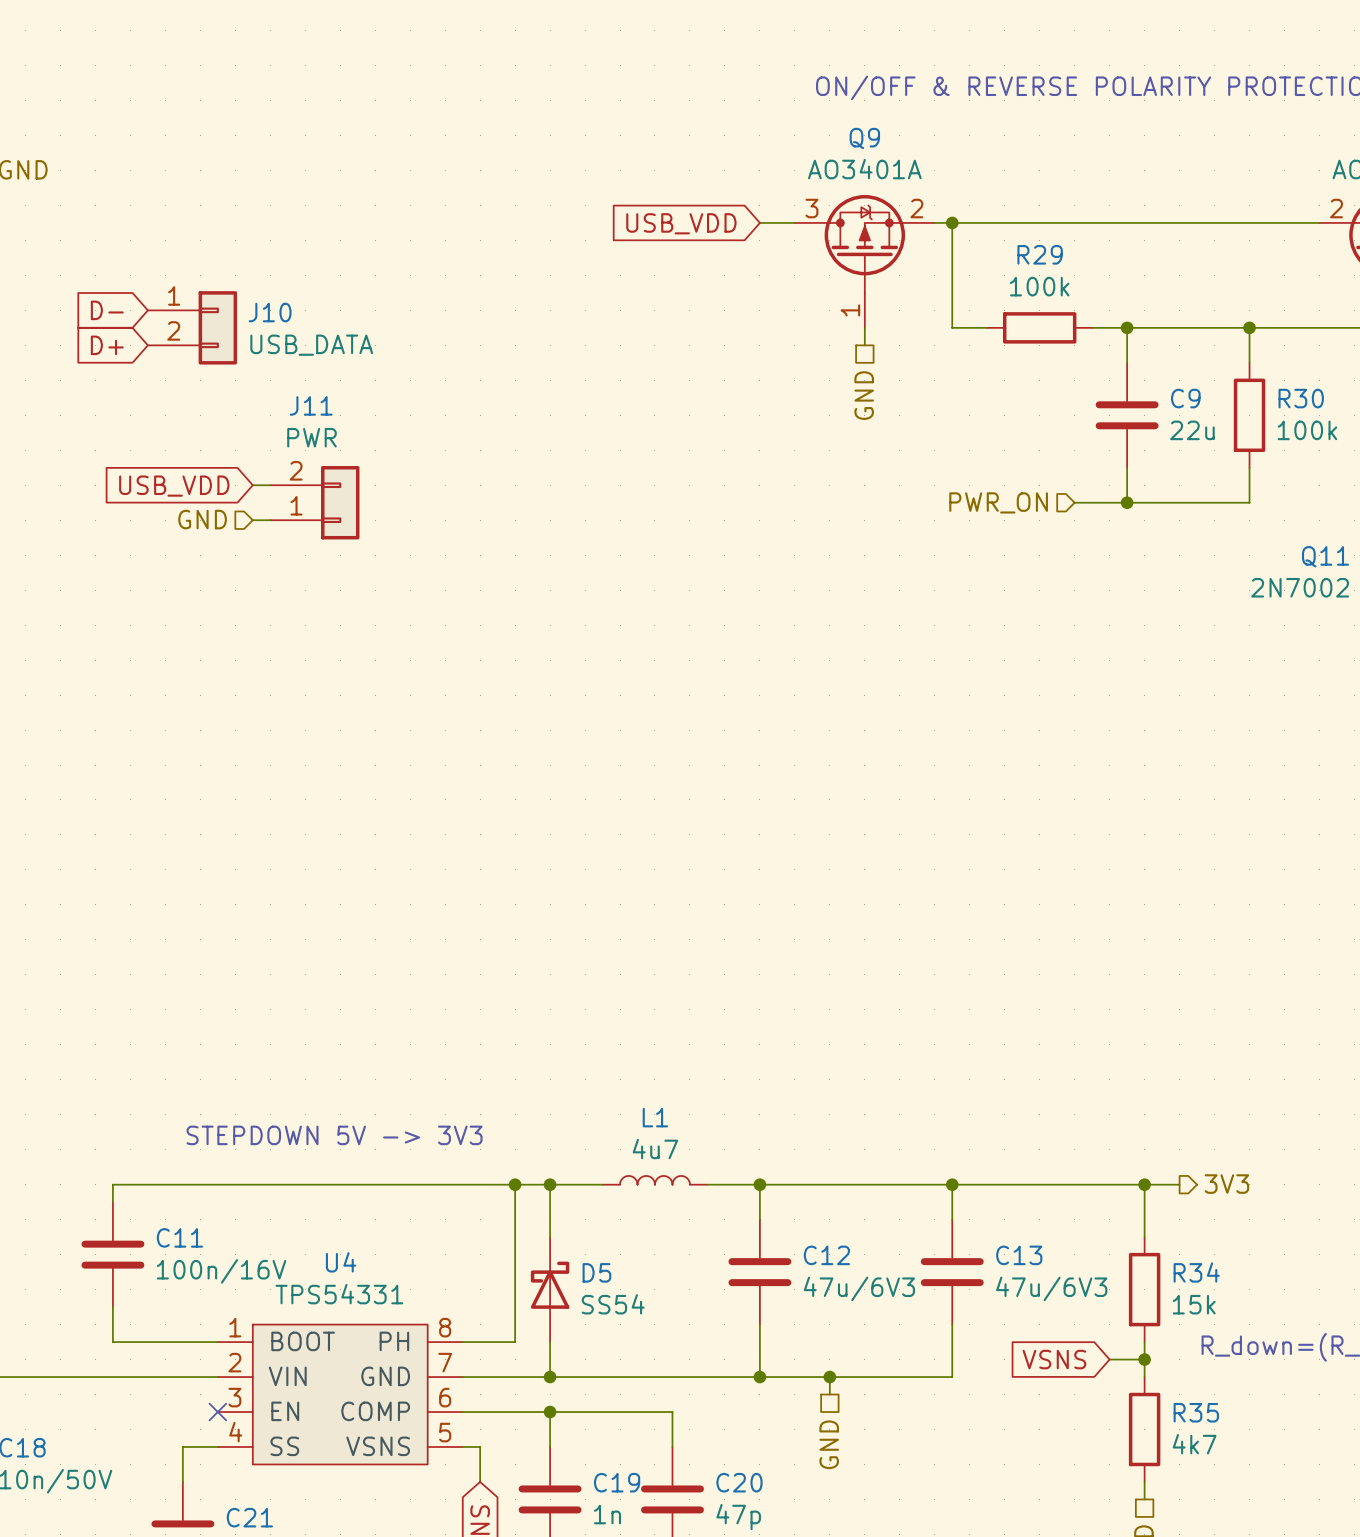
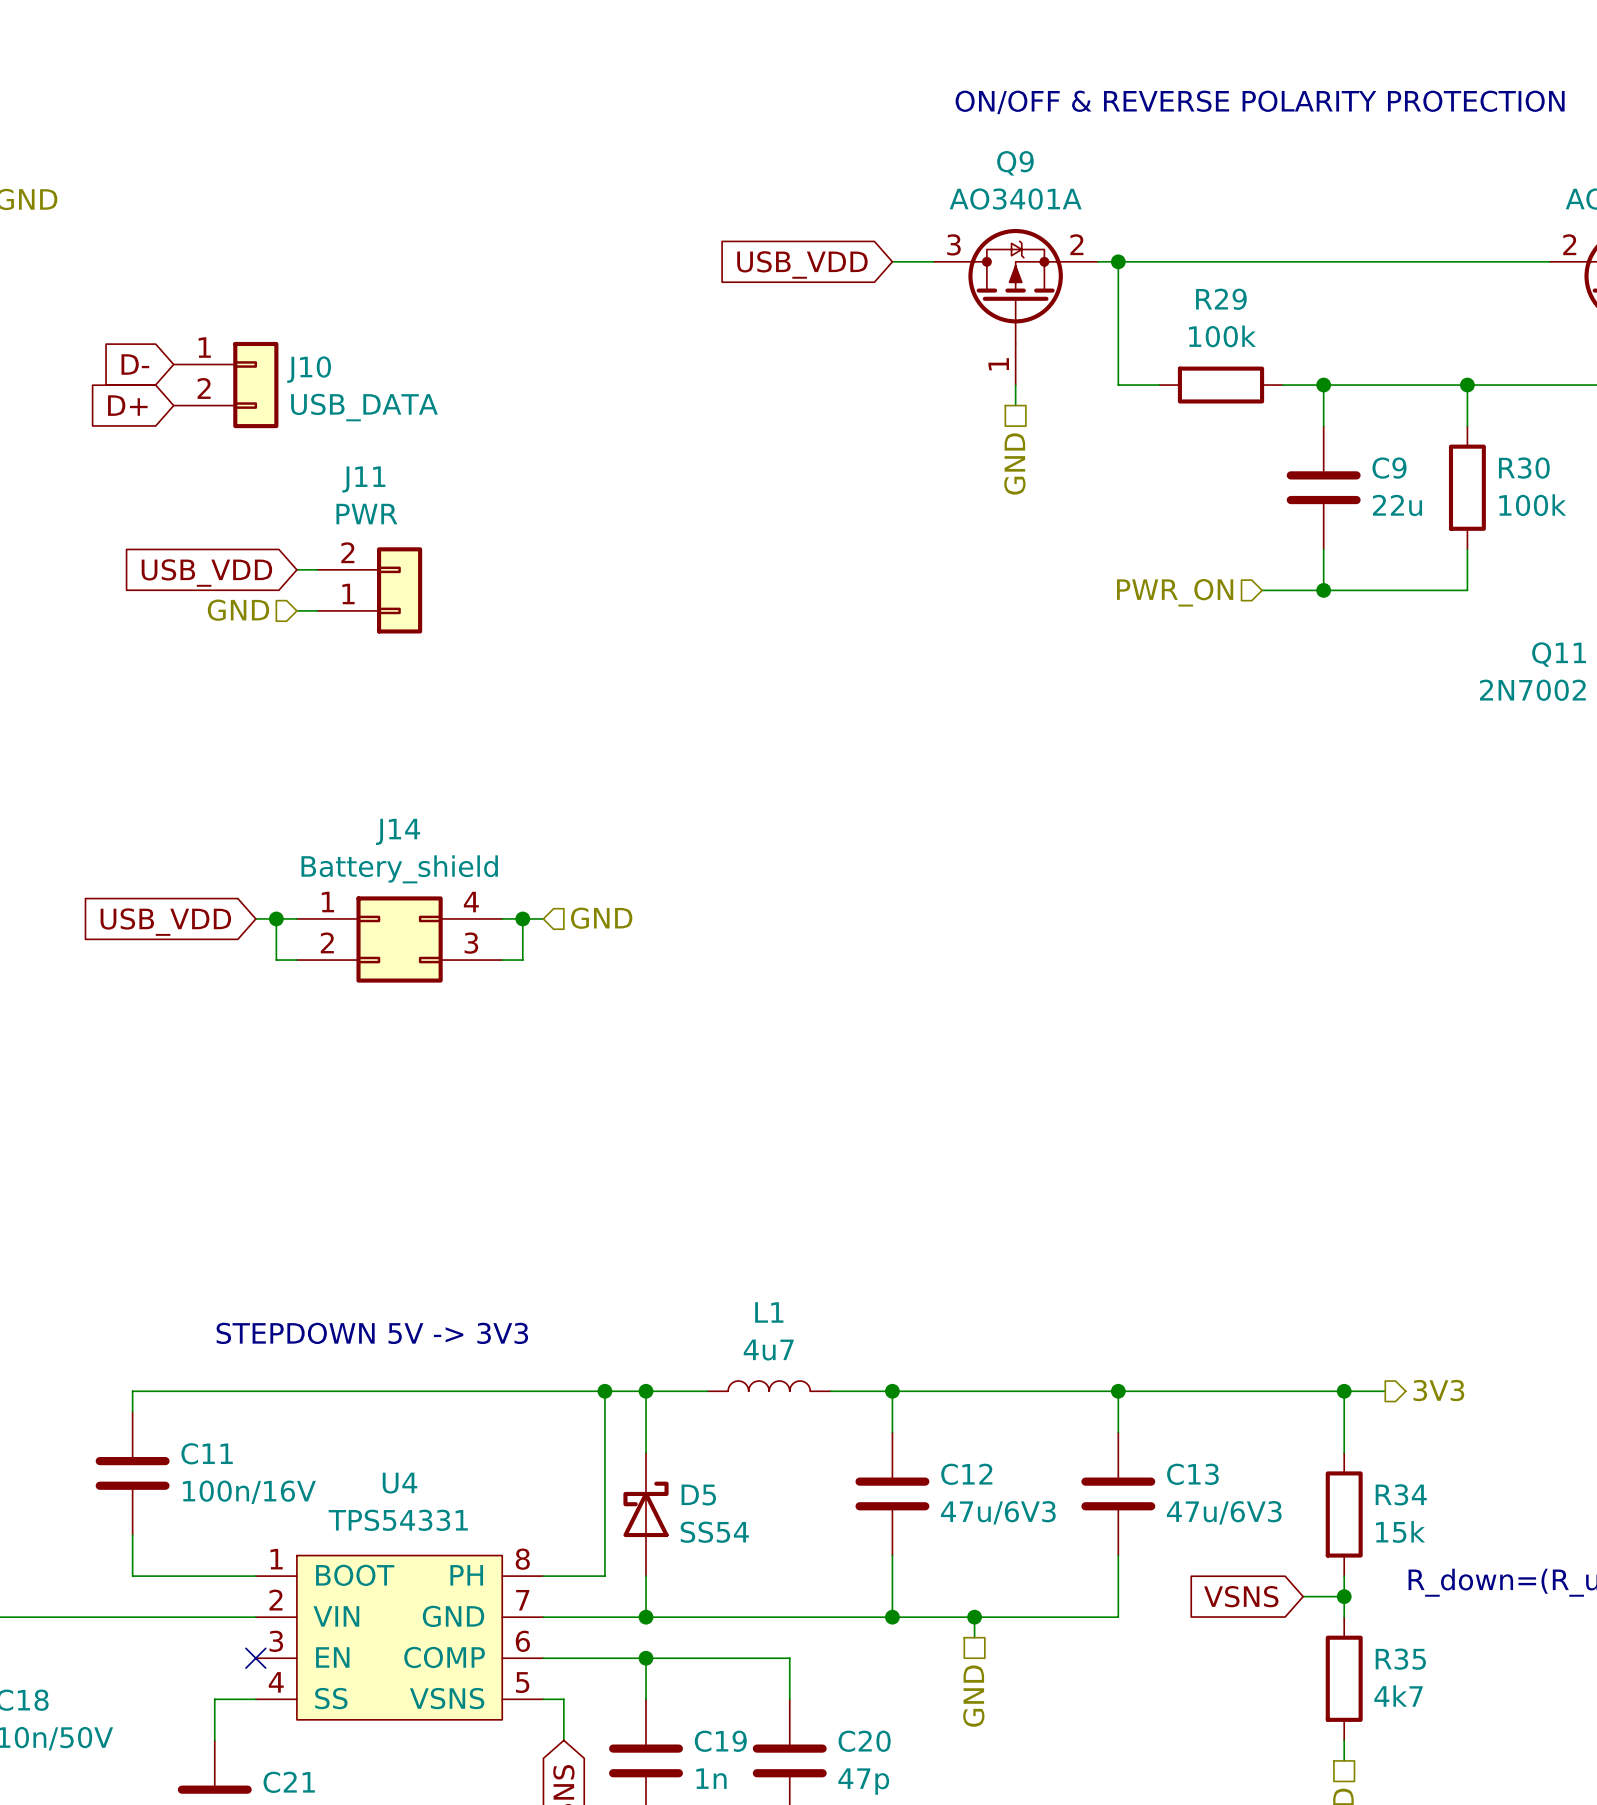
hierarchical label: none -> GND (601, 918)
wire: none -> (255, 918) (296, 918)
wire: none -> (276, 918) (276, 960) (296, 960)
junction: none -> (276, 918)
wire: none -> (502, 918) (543, 918)
wire: none -> (522, 918) (522, 960) (502, 960)
junction: none -> (522, 918)
global label: none -> USB_VDD (165, 922)
J14: none -> Battery_shield (399, 939)

